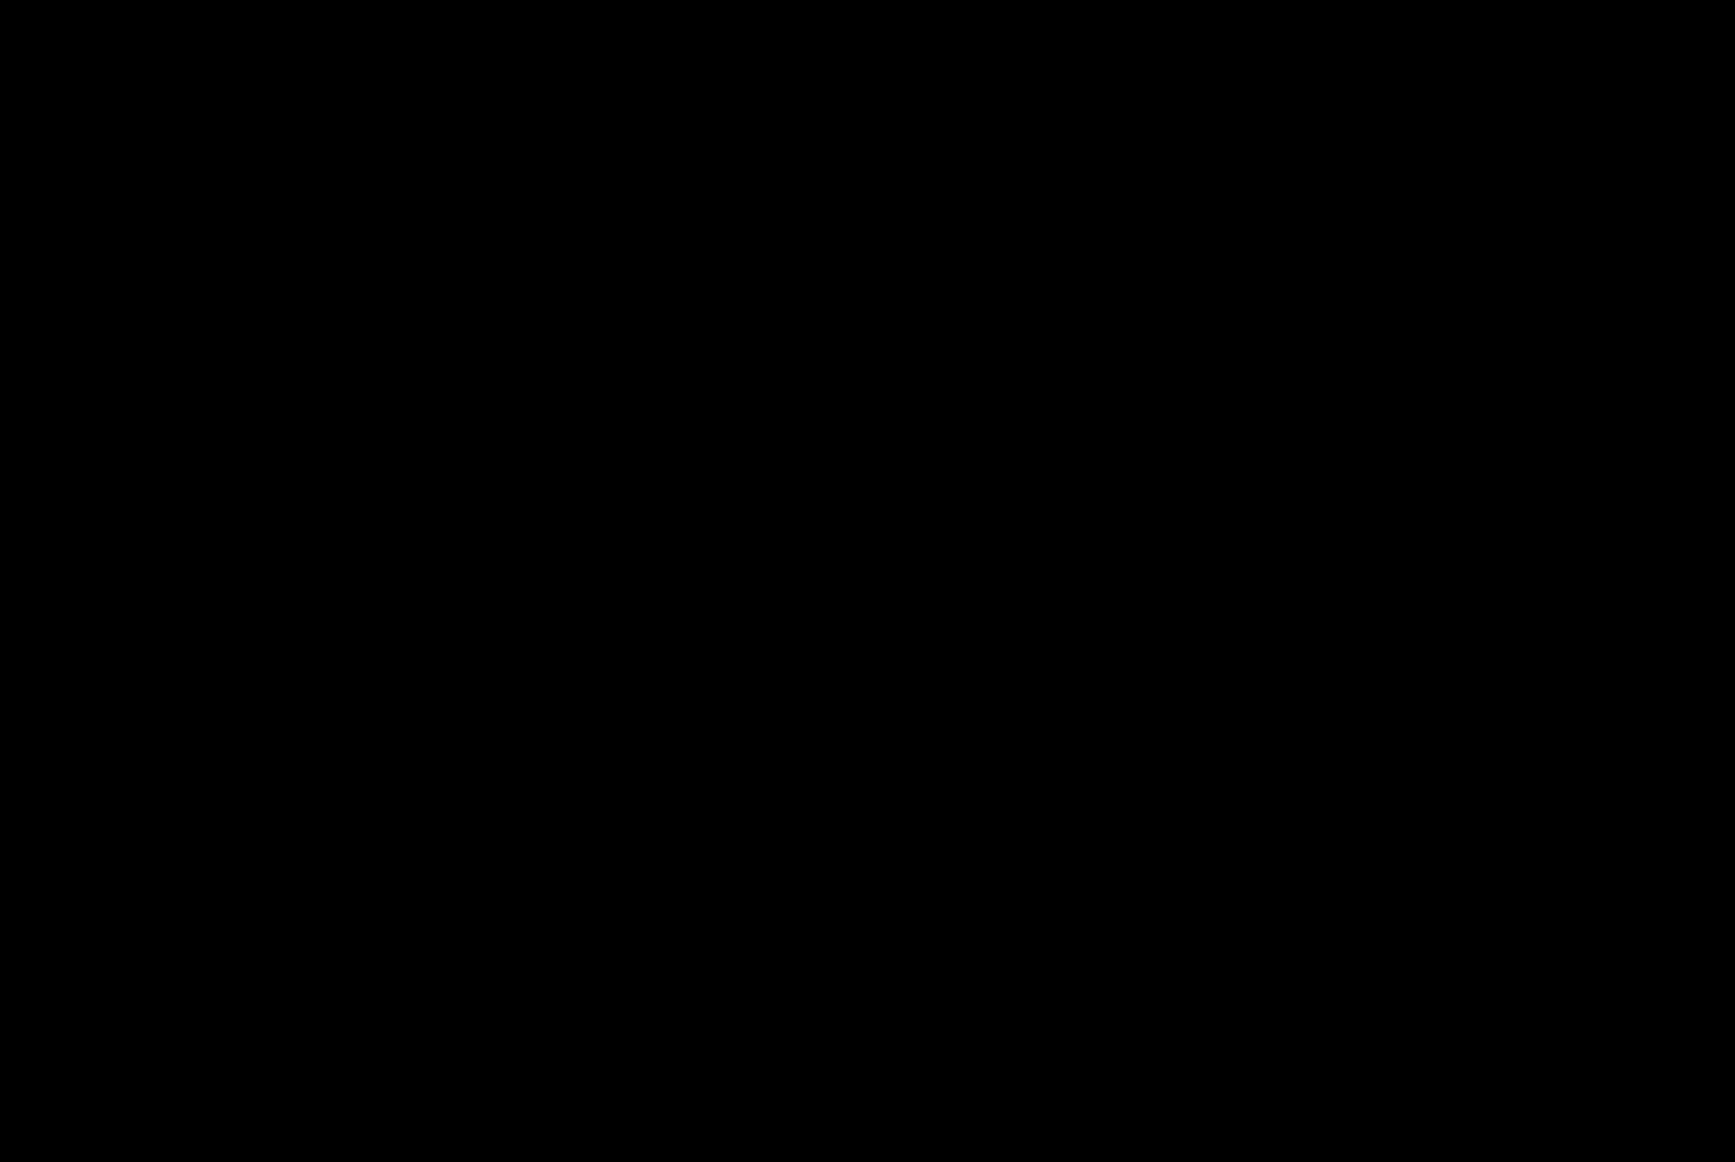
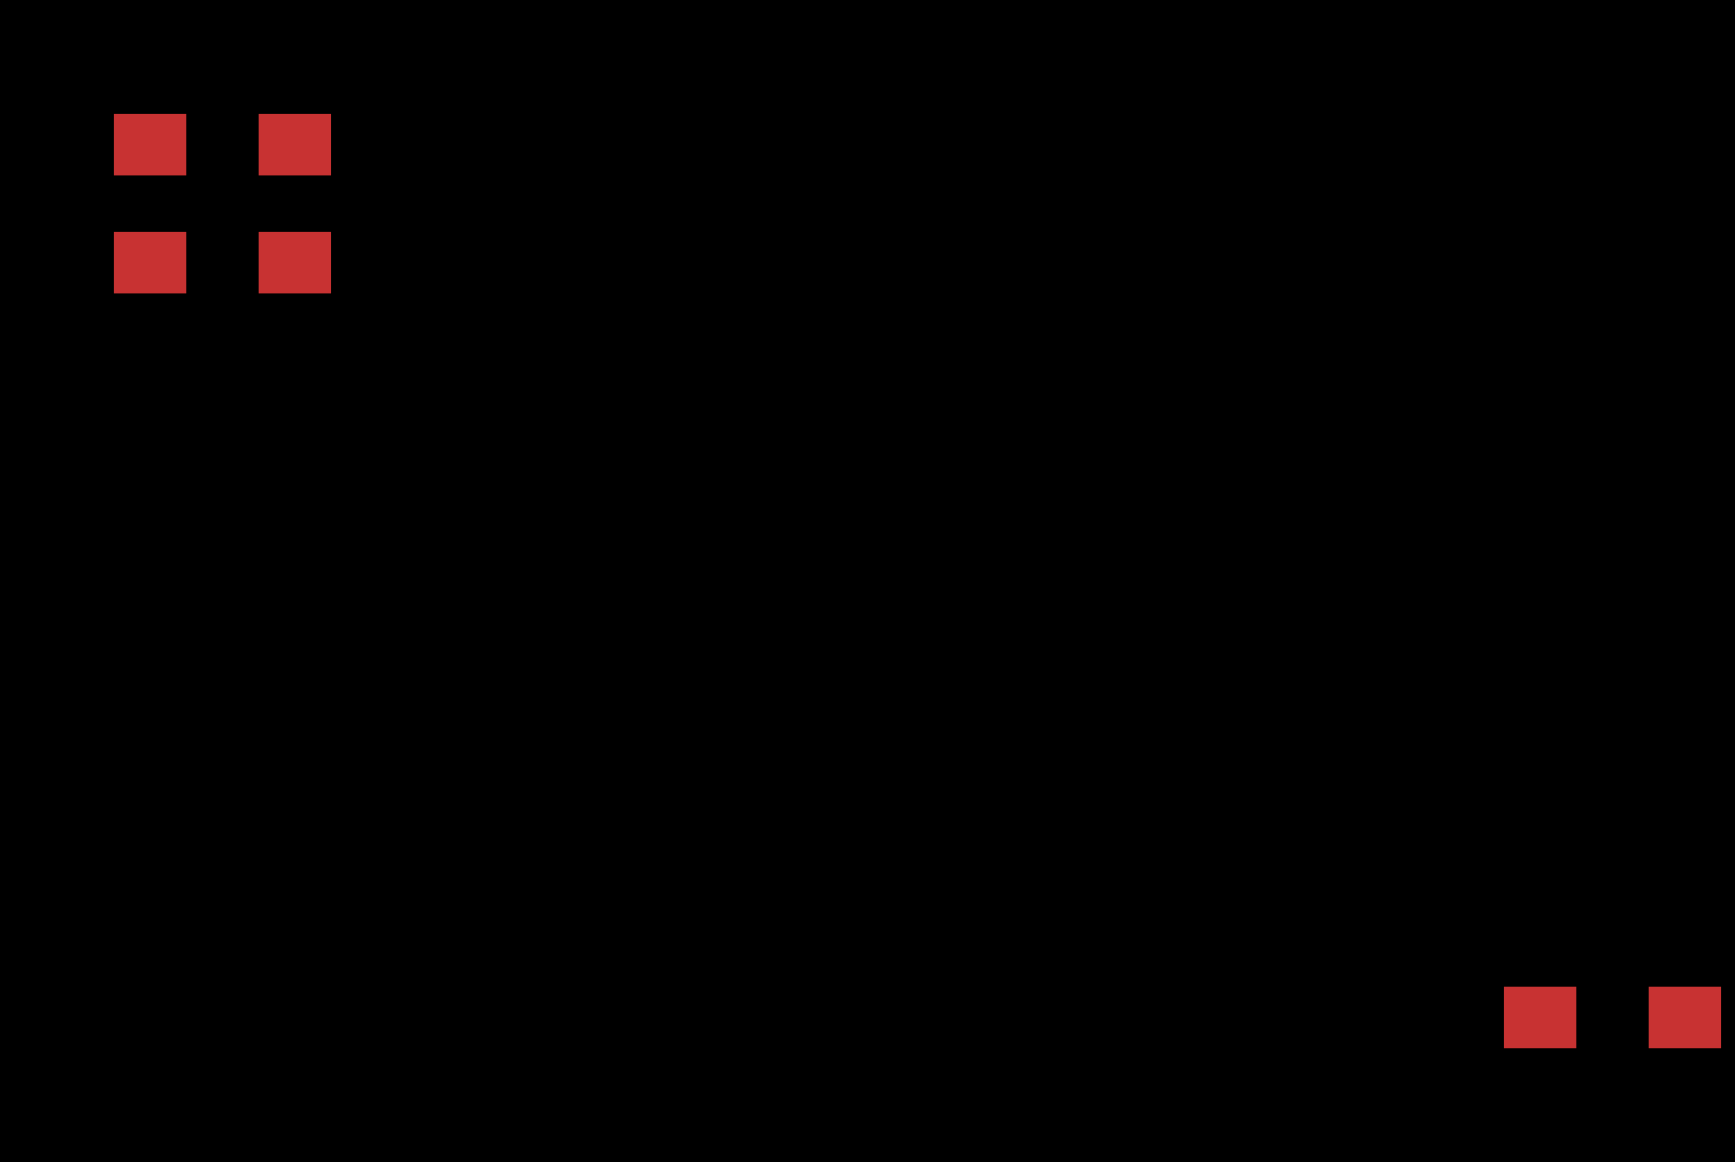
part: none -> (222, 144)
part: none -> (222, 262)
part: none -> (1612, 1017)

